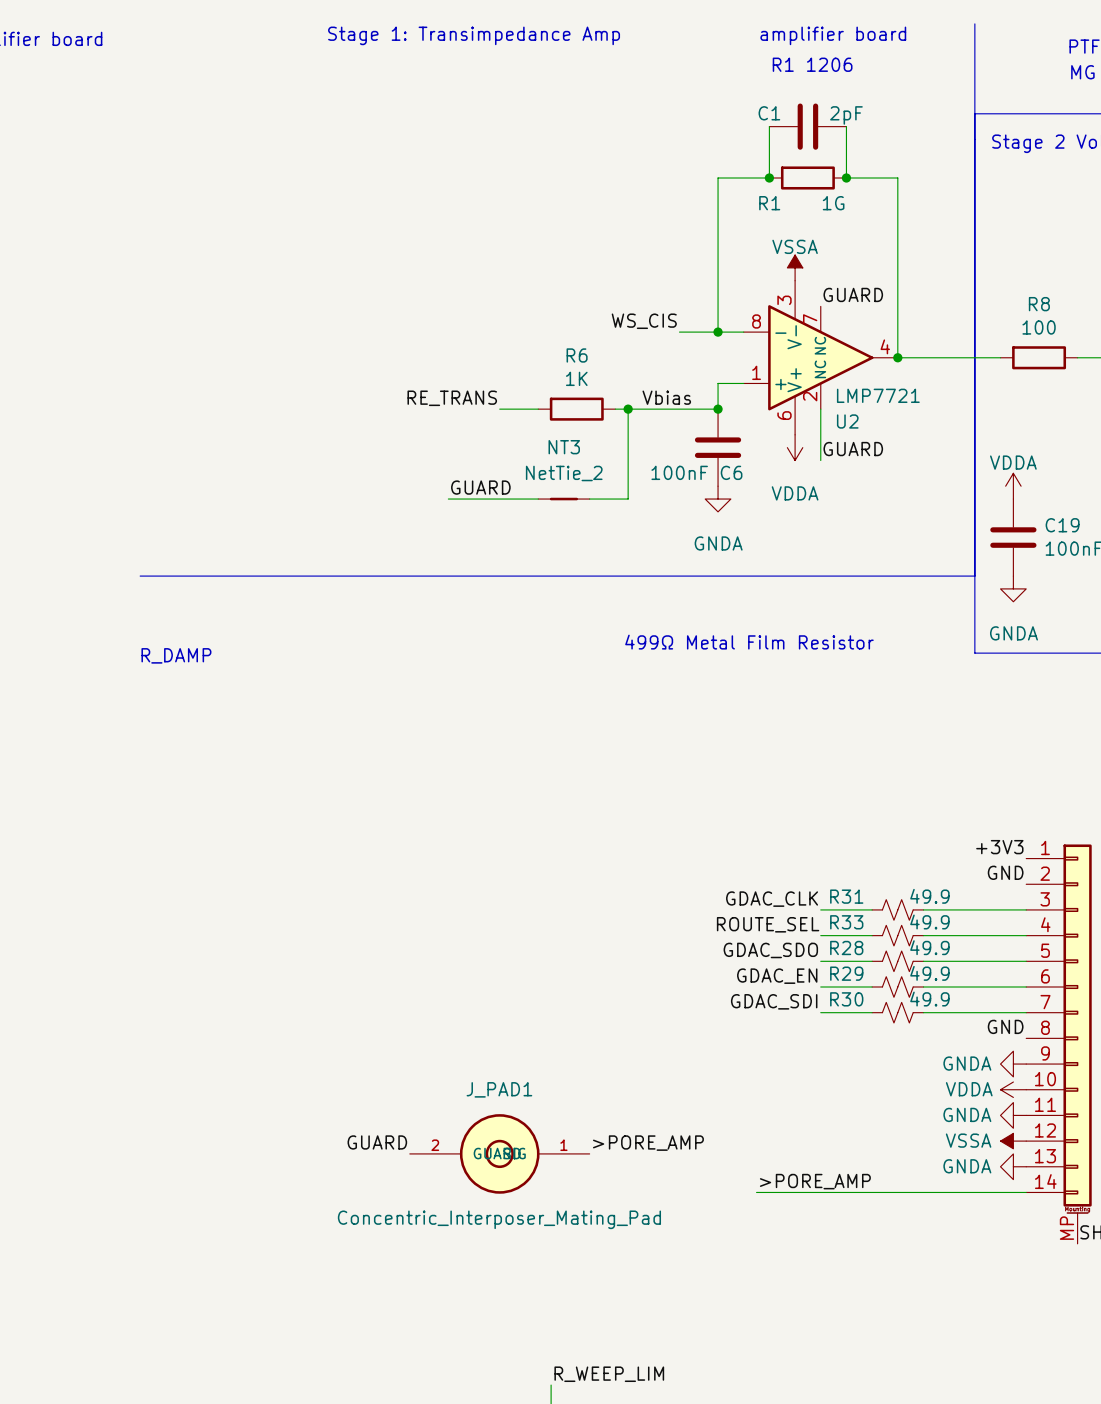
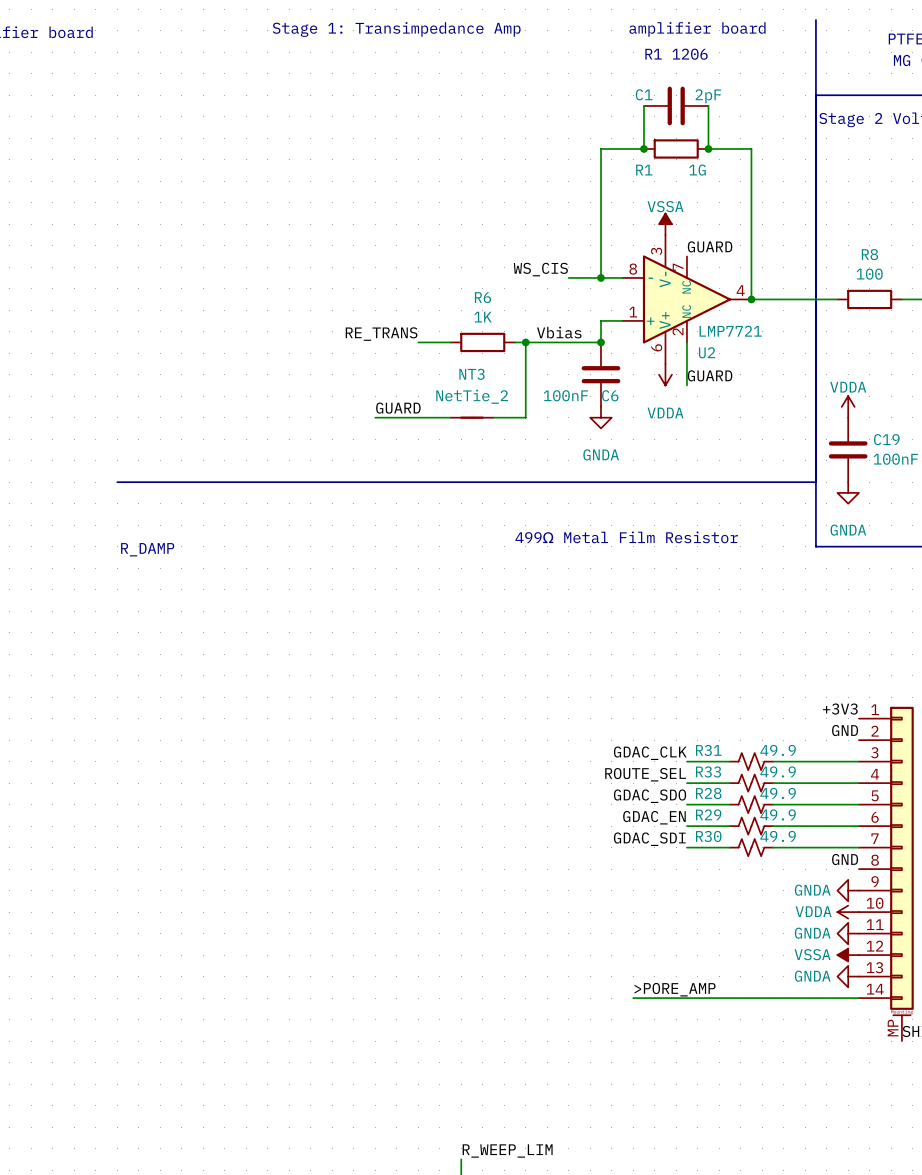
label: GUARD (377, 1142) -> none
label: >PORE_AMP (648, 1143) -> none
J_PAD1: Concentric_Interposer_Mating_Pad (499, 1153) -> none

